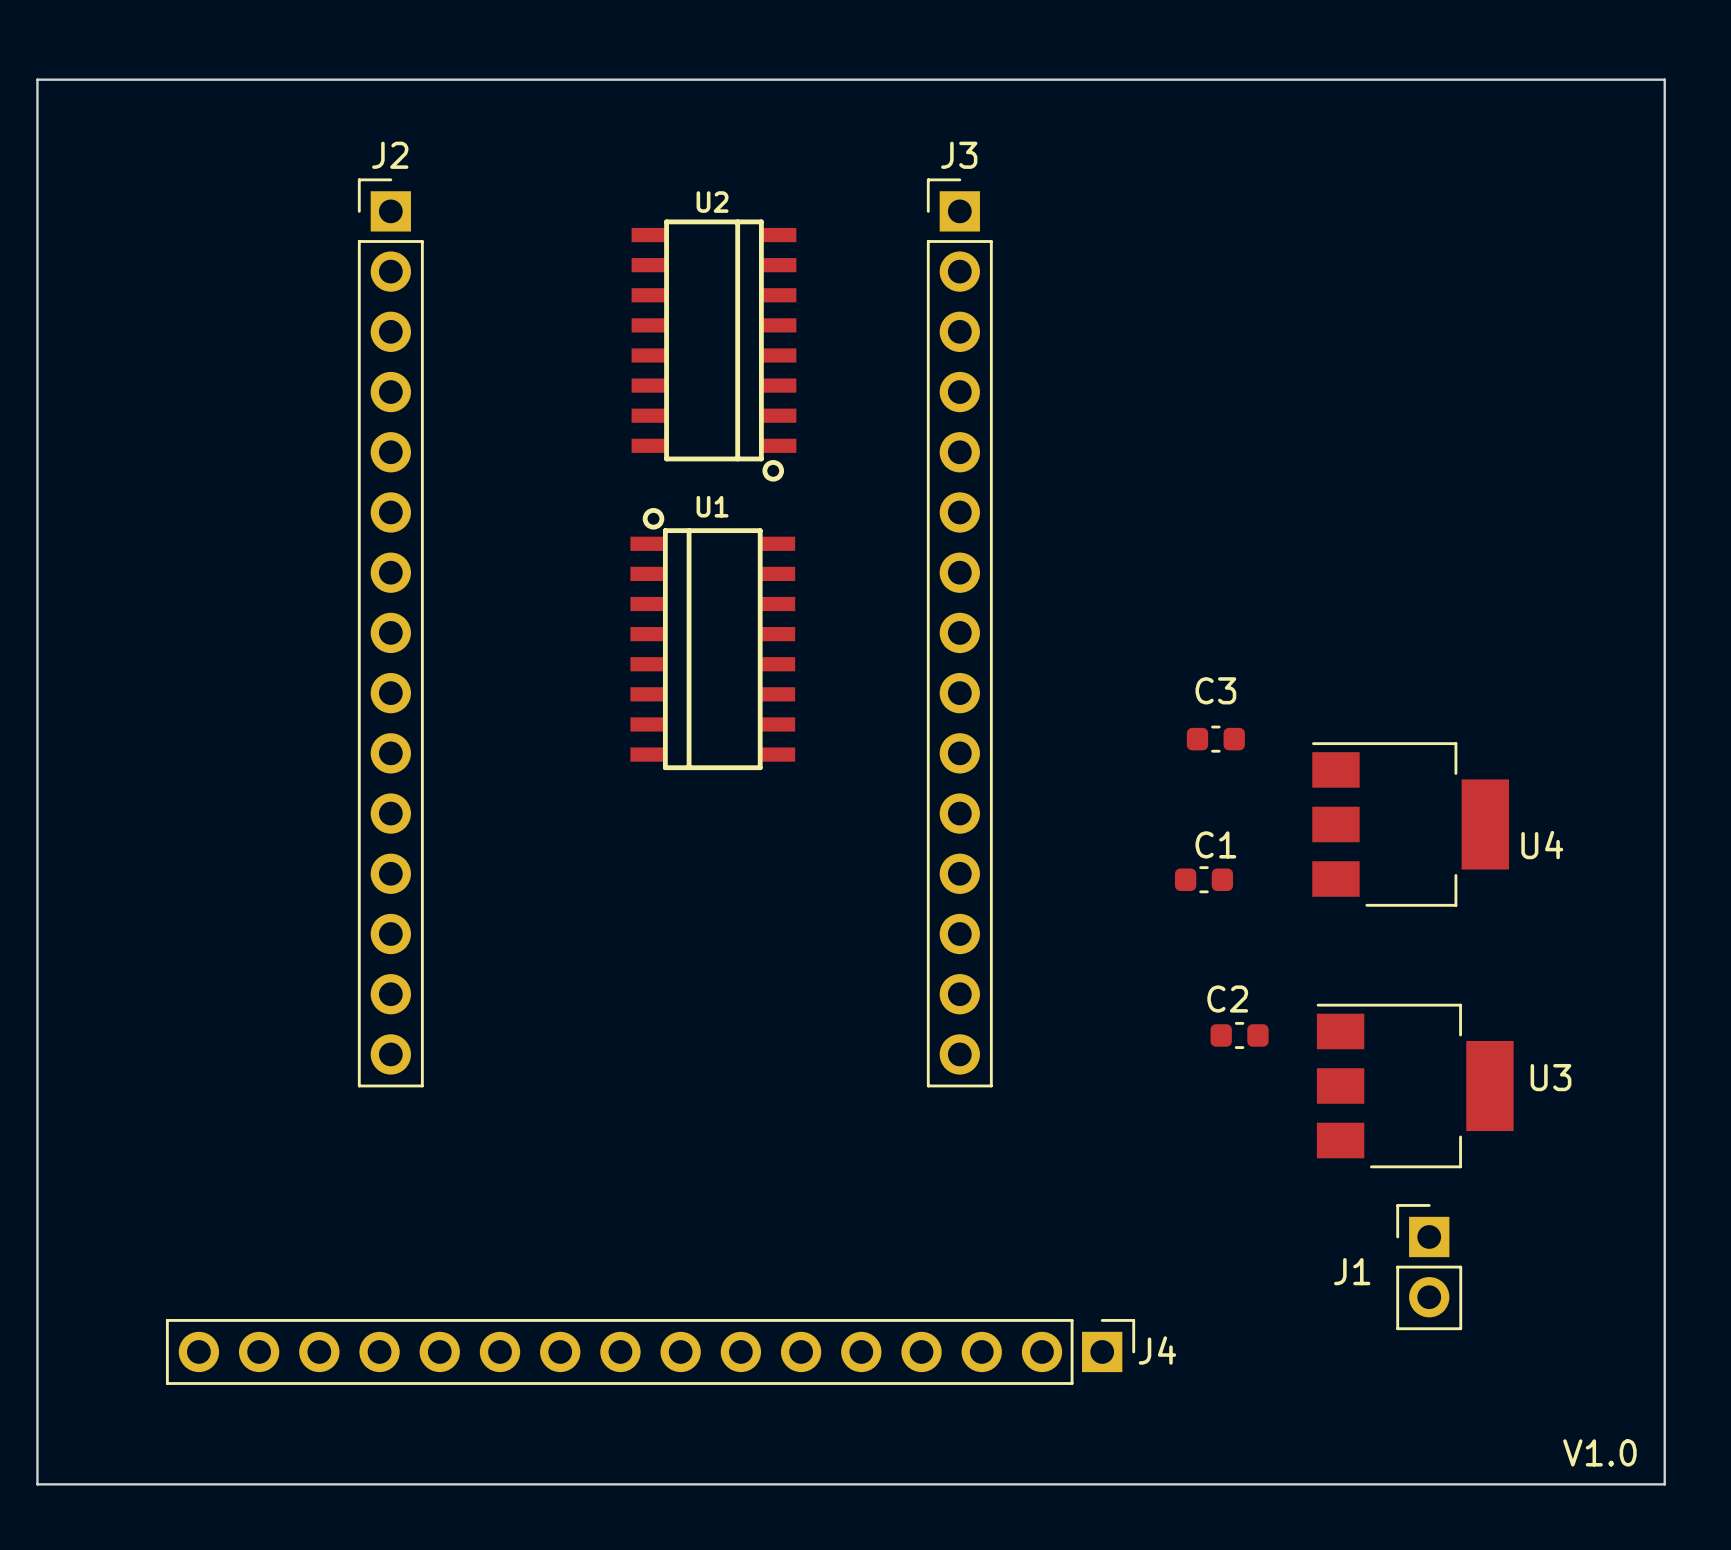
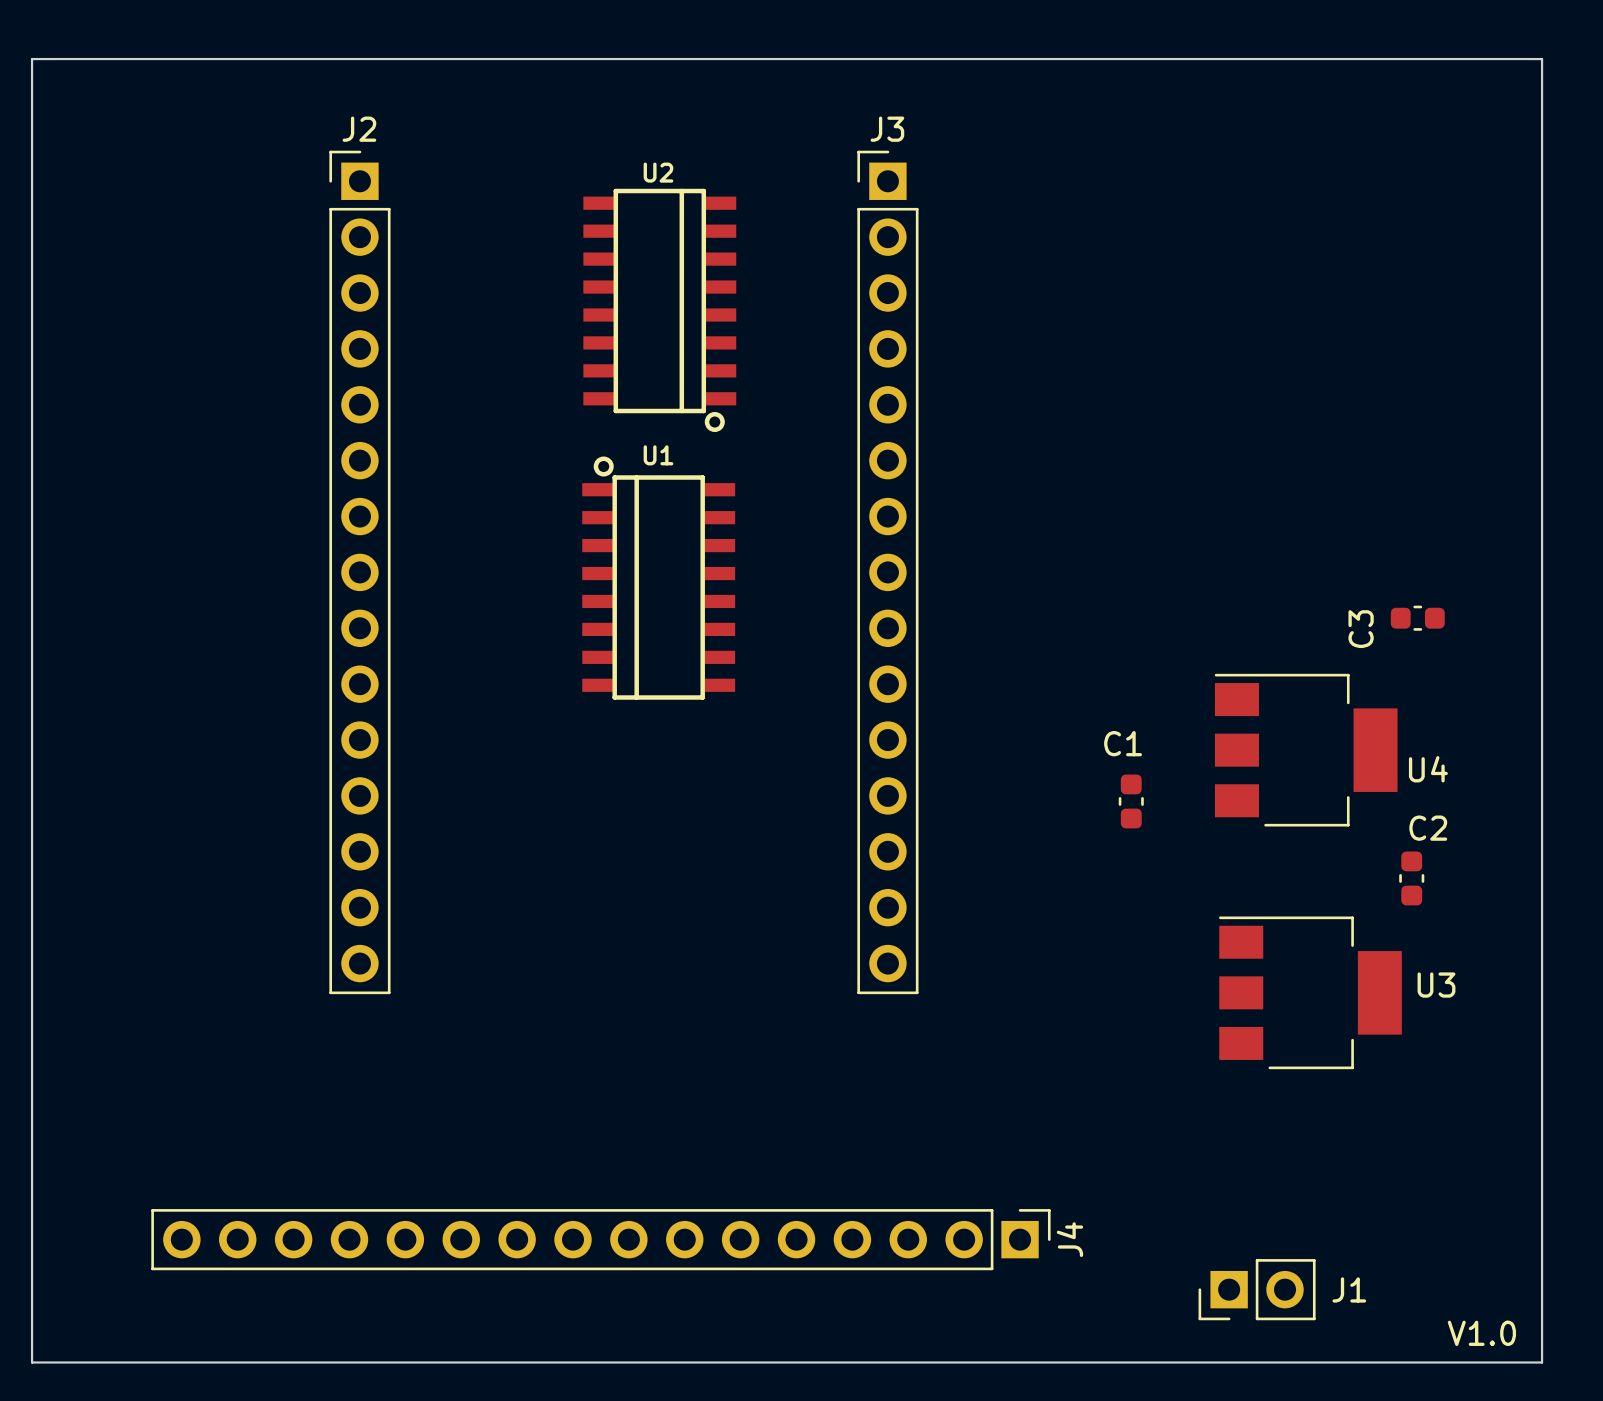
C3 name rotation: 0° (1215, 690) -> 90° counterclockwise (1361, 629)
C3 name position: C3 (1215, 690) -> C3 (1361, 629)
C3 position: (1215, 739) -> (1417, 618)
C1 rotation: 0° (1204, 879) -> 90° clockwise (1131, 801)
C2 rotation: 0° (1239, 1035) -> 90° clockwise (1411, 878)
C2 position: (1239, 1035) -> (1411, 878)
J1 rotation: 0° (1429, 1267) -> 90° counterclockwise (1257, 1289)
J1 position: (1429, 1267) -> (1257, 1289)
J1 name position: J1 (1352, 1271) -> J1 (1349, 1289)
J4 name rotation: 0° (1157, 1350) -> 90° counterclockwise (1069, 1239)

